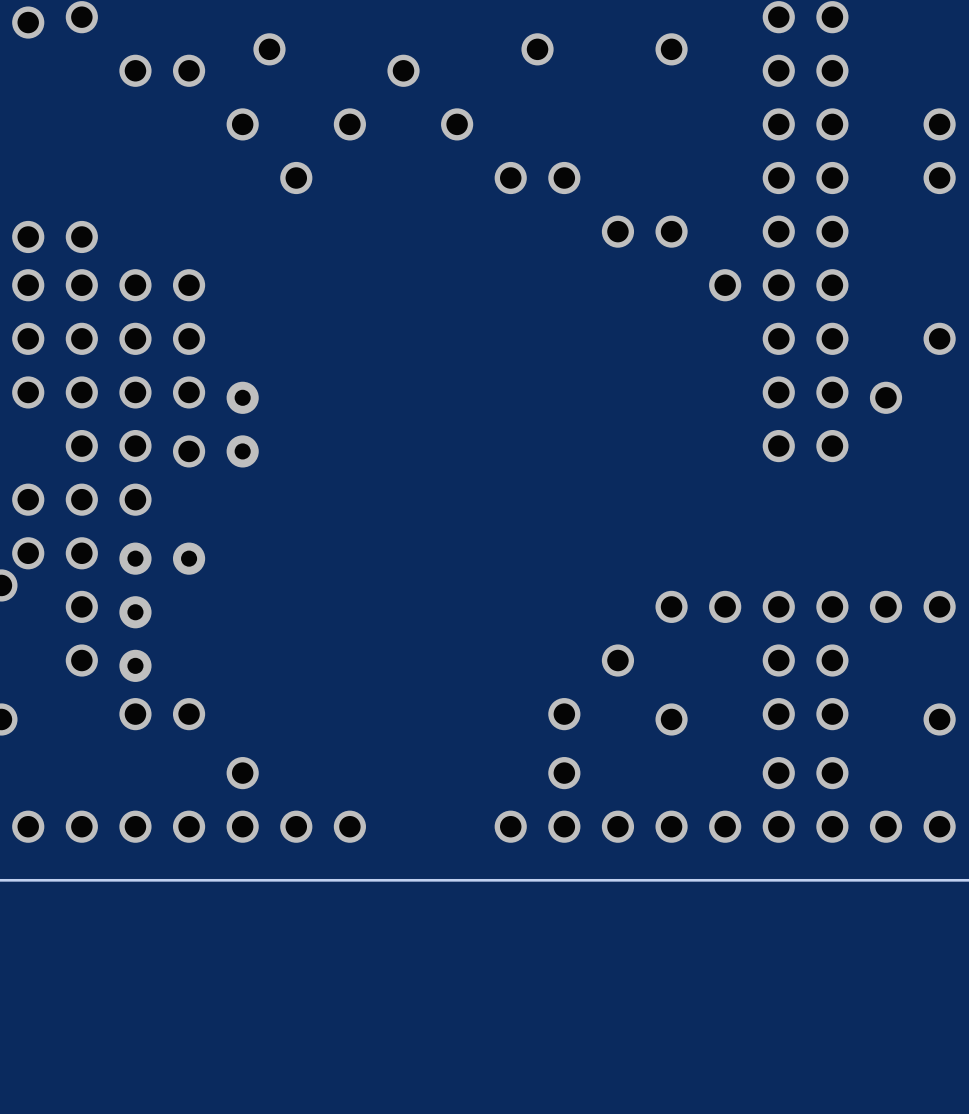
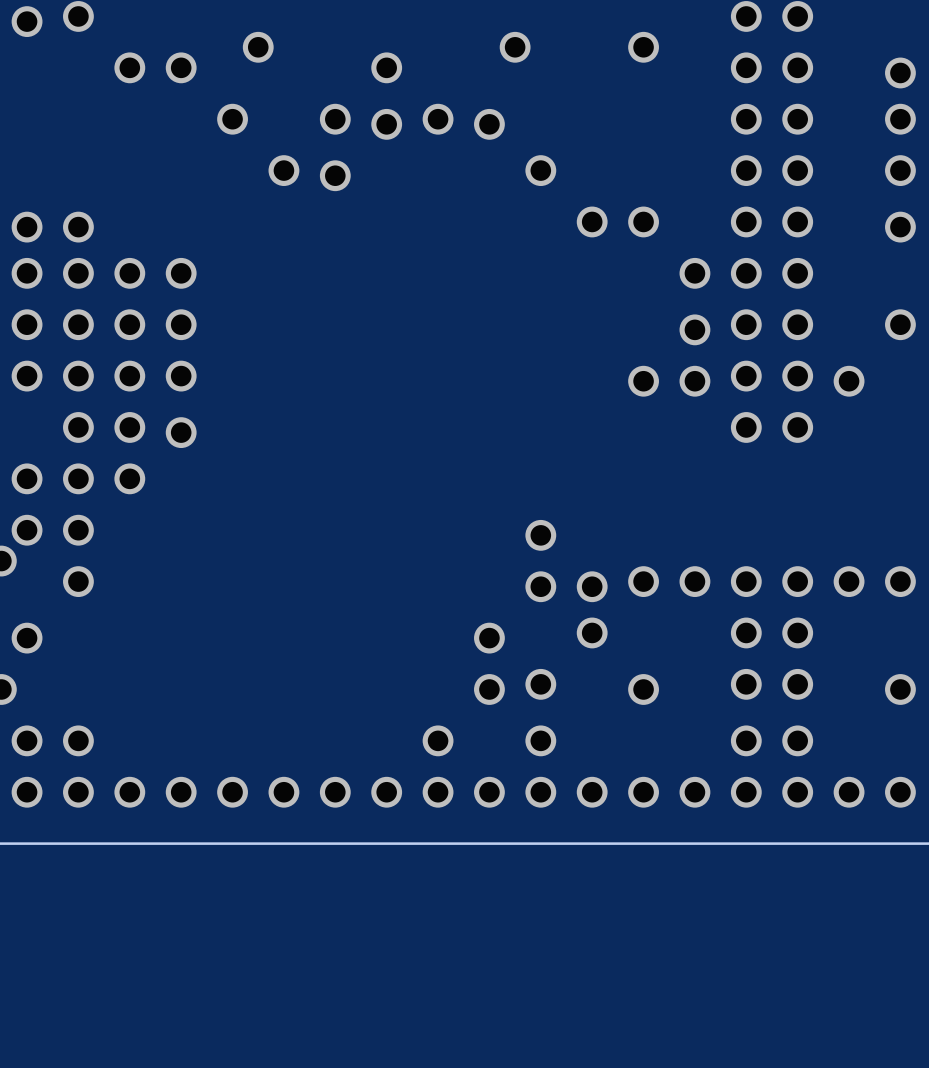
via: none -> (900, 72)
via: none -> (386, 124)
via position: (510, 178) -> (489, 124)
via: none -> (335, 175)
via: none -> (900, 227)
via: none -> (694, 329)
via: (242, 397) -> none
via: none -> (643, 381)
via: none -> (694, 381)
via: (242, 451) -> none
via: (135, 558) -> none
via: (189, 558) -> none
via: none -> (540, 535)
via: (135, 612) -> none
via: none -> (540, 586)
via: none -> (592, 586)
via position: (81, 660) -> (27, 638)
via: (135, 665) -> none
via: none -> (489, 638)
via: (135, 714) -> none
via: (189, 714) -> none
via: none -> (489, 689)
via: none -> (27, 740)
via: none -> (78, 740)
via: (242, 773) -> none
via: none -> (438, 740)
via: none -> (386, 792)
via: none -> (438, 792)

